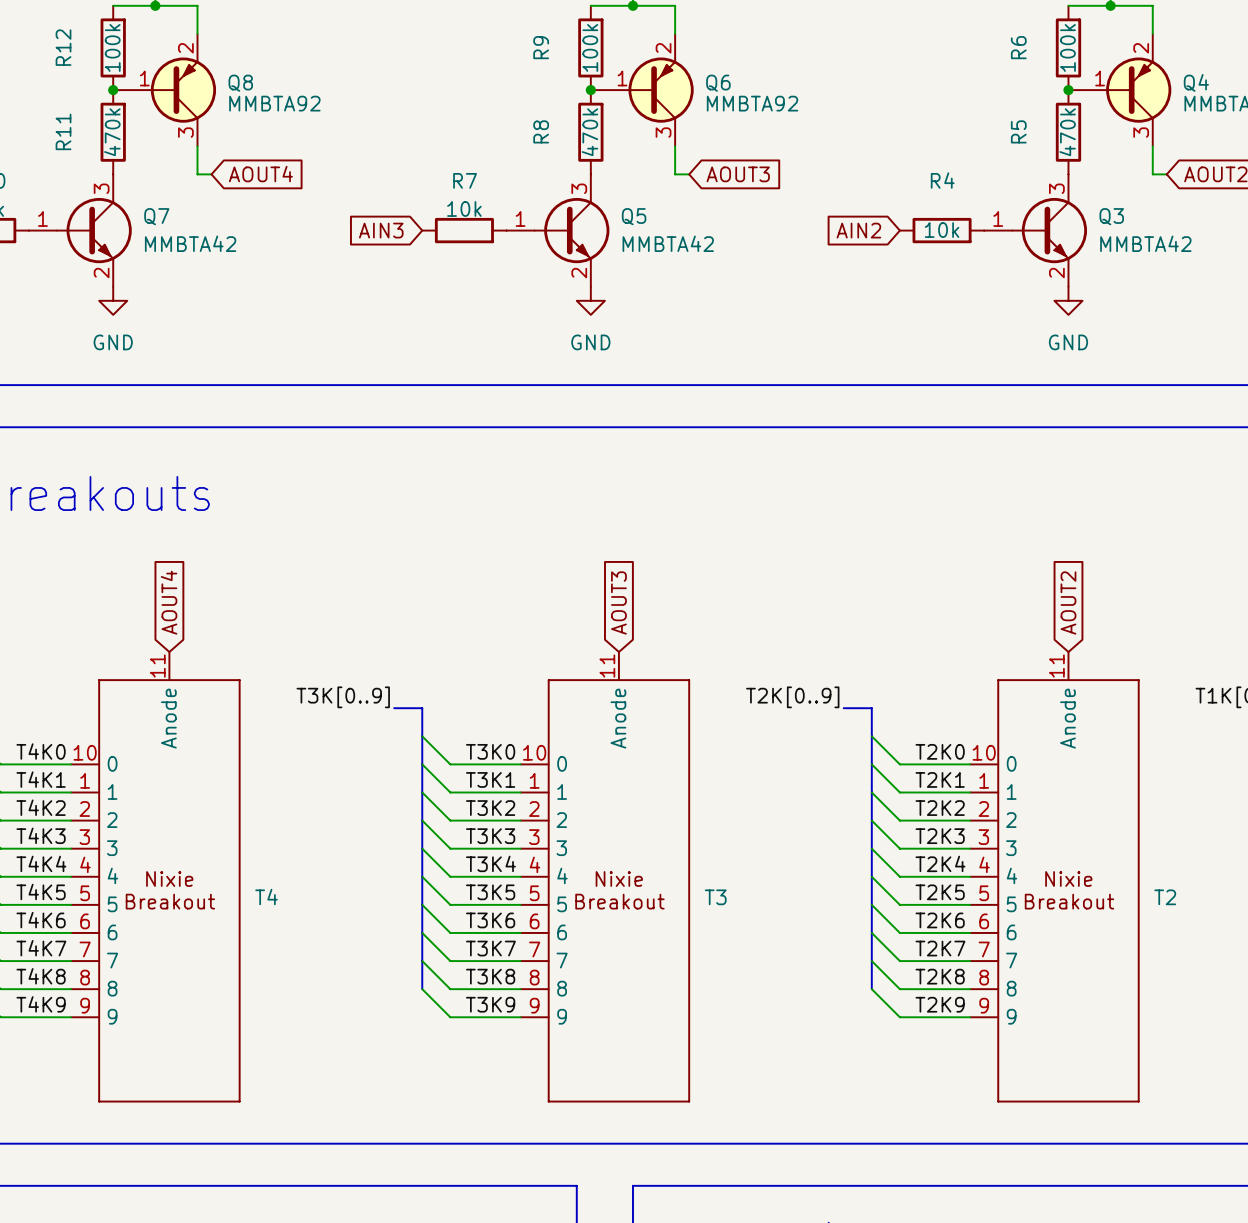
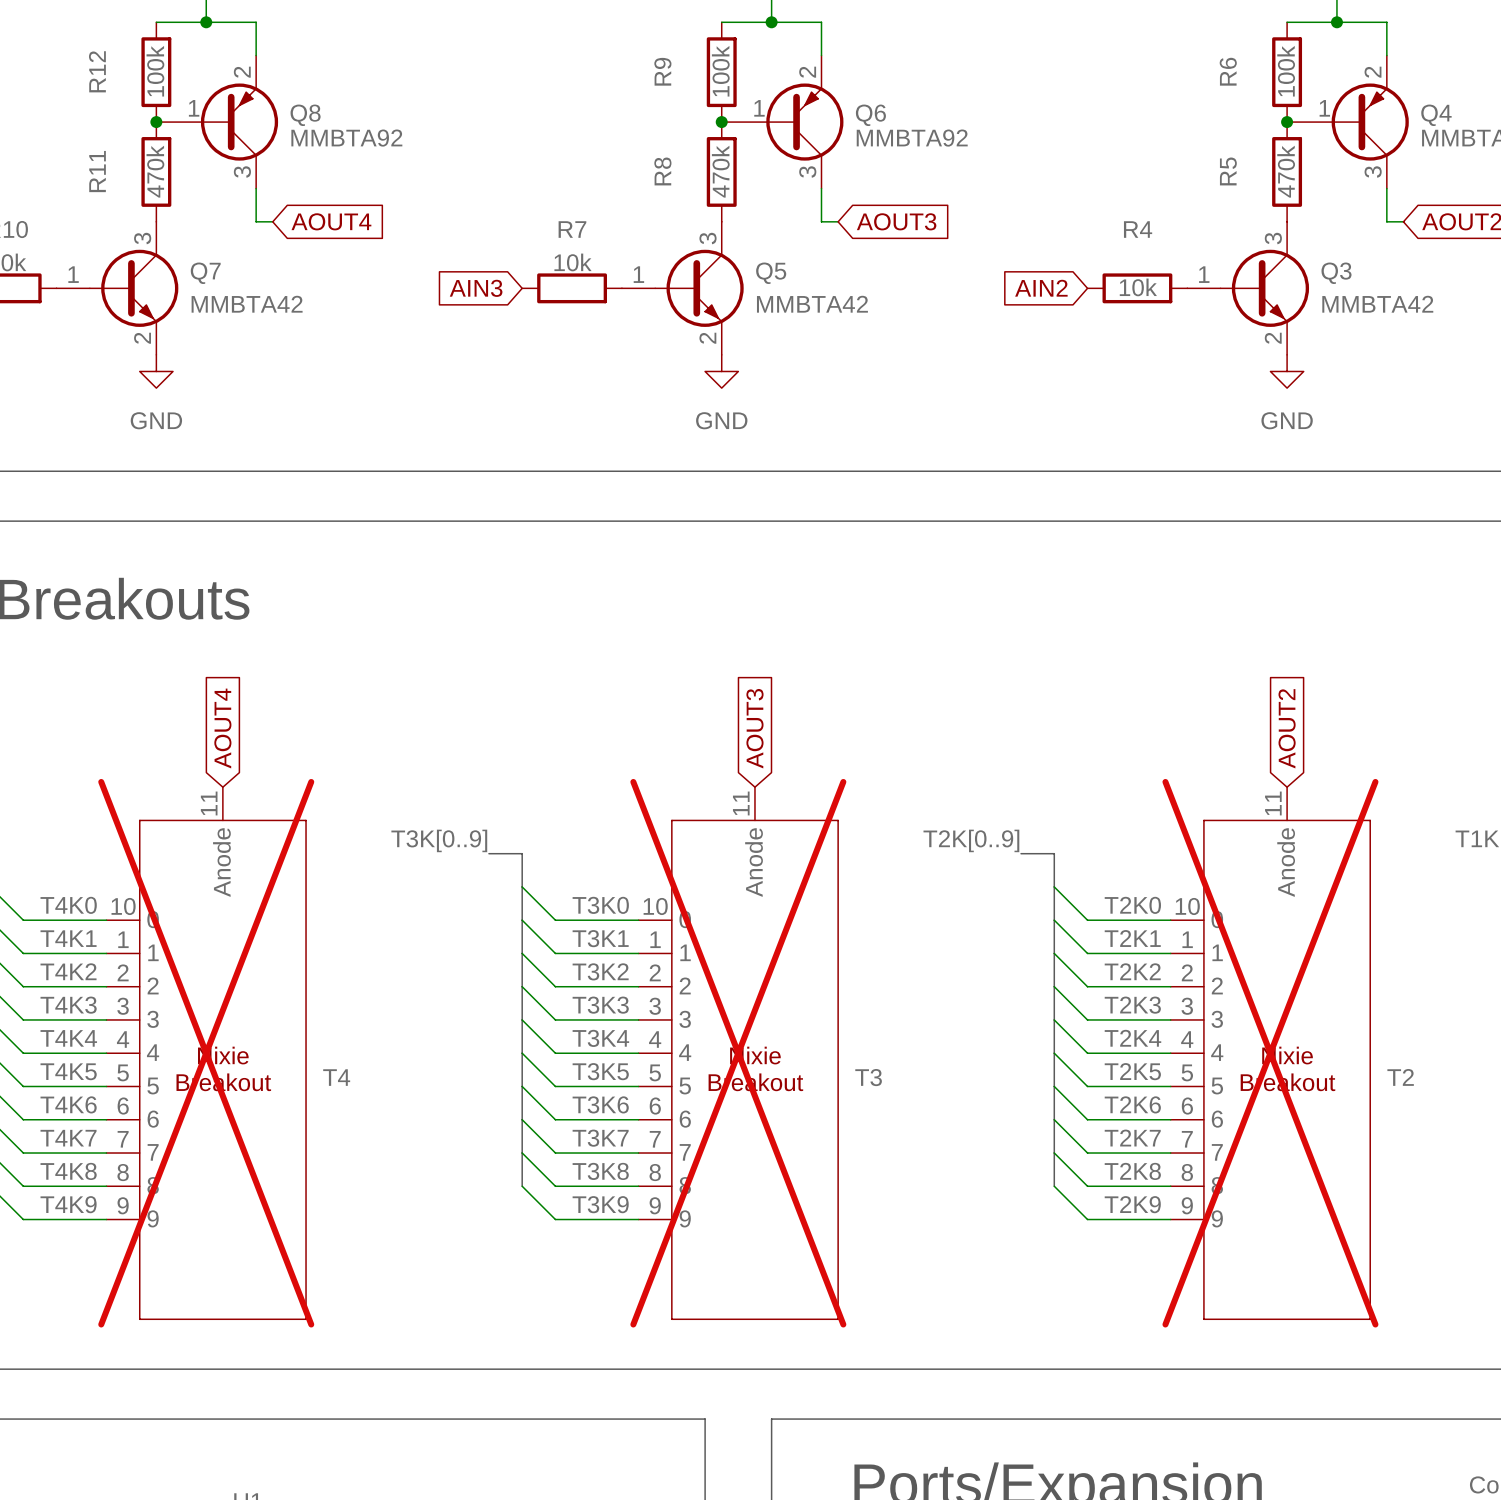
T4 do-not-place cross: none -> (206, 1053)
T3 do-not-place cross: none -> (738, 1053)
T2 do-not-place cross: none -> (1270, 1053)

